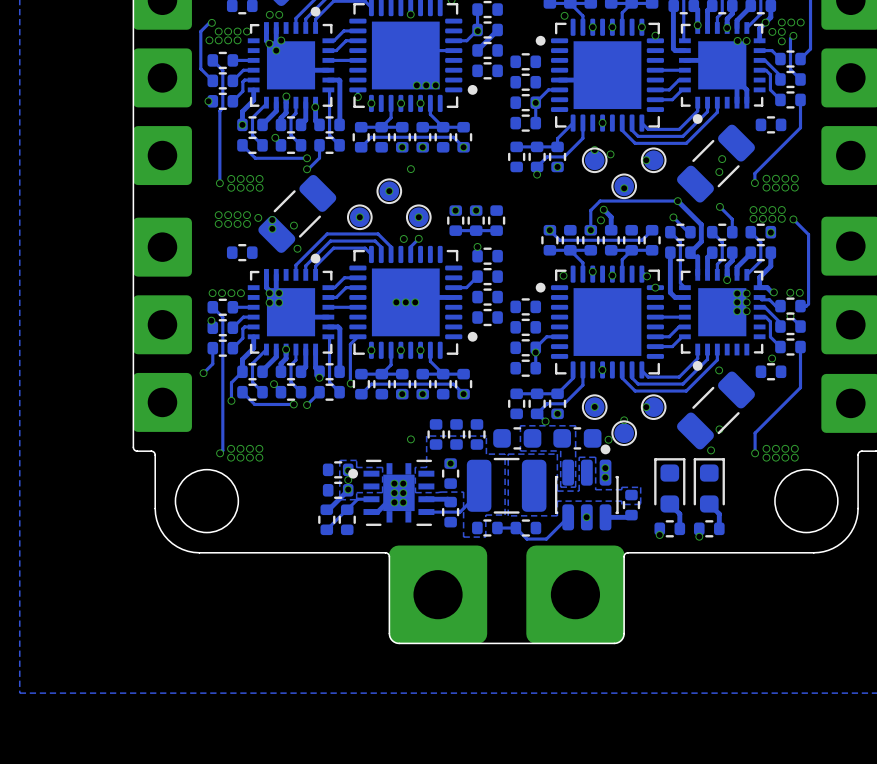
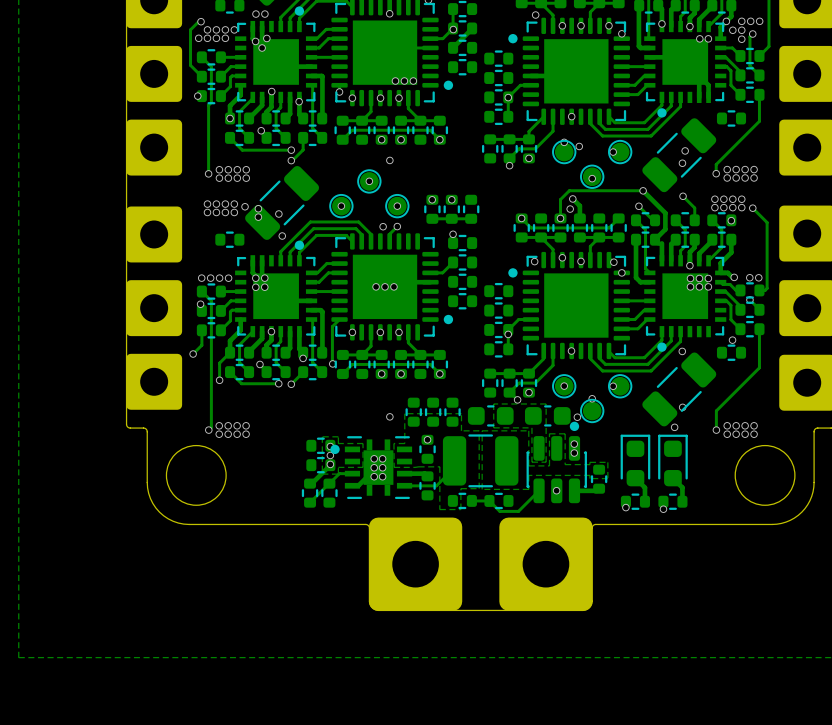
via: none -> (690, 278)
via: none -> (690, 286)
via: (737, 311) -> none
via: (746, 311) -> none

